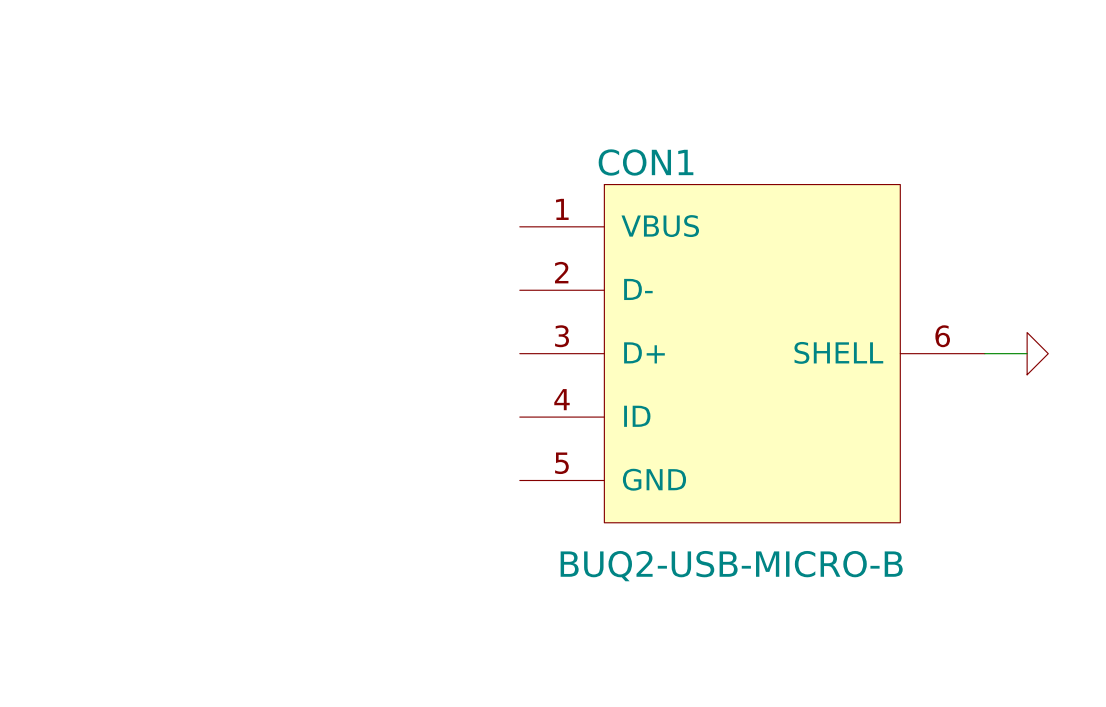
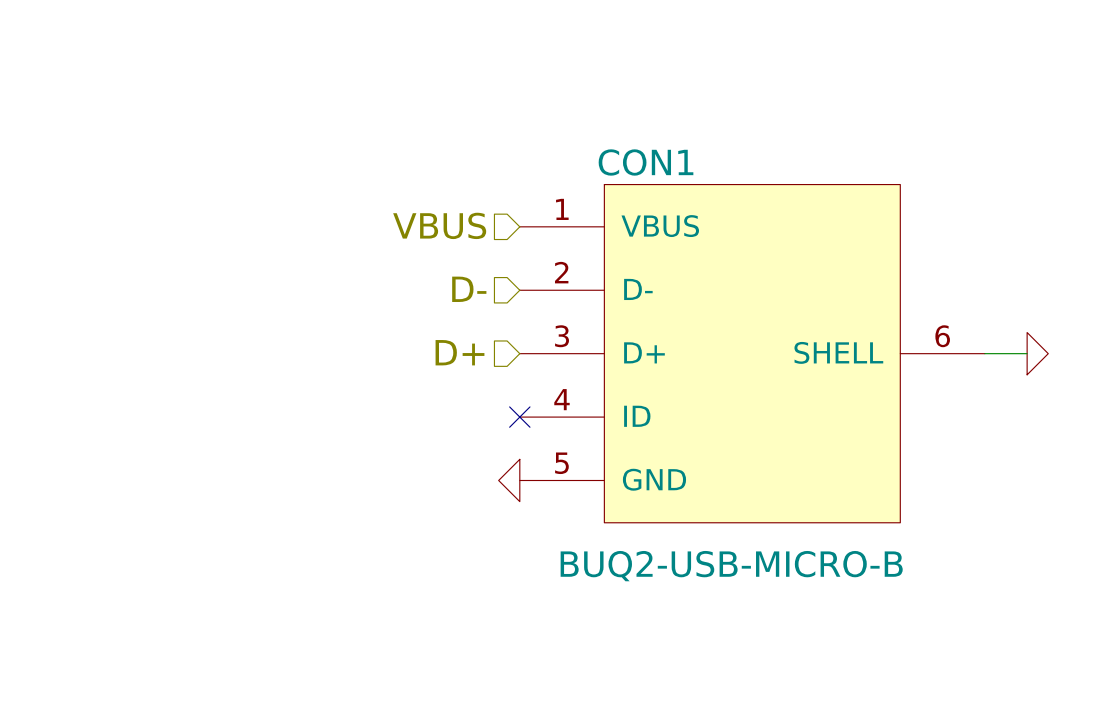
hierarchical label: none -> VBUS (439, 225)
hierarchical label: none -> D- (469, 289)
hierarchical label: none -> D+ (459, 352)
no-connect mark: none -> (519, 417)
power symbol: none -> (509, 480)

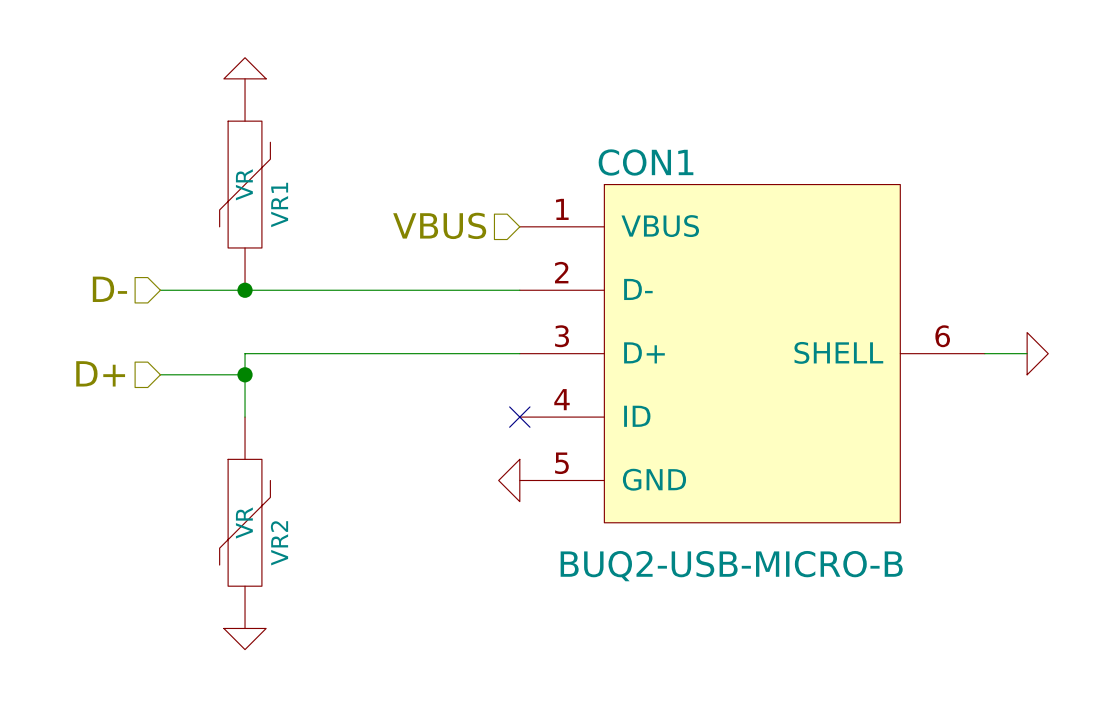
power symbol: none -> (245, 68)
VR1: none -> VR (245, 184)
hierarchical label position: D- (469, 289) -> D- (109, 289)
wire: none -> (160, 290) (519, 290)
junction: none -> (245, 290)
hierarchical label position: D+ (459, 352) -> D+ (100, 373)
wire: none -> (519, 353) (245, 353) (245, 417)
wire: none -> (160, 374) (245, 374)
junction: none -> (245, 374)
VR2: none -> VR (245, 522)
power symbol: none -> (245, 639)

